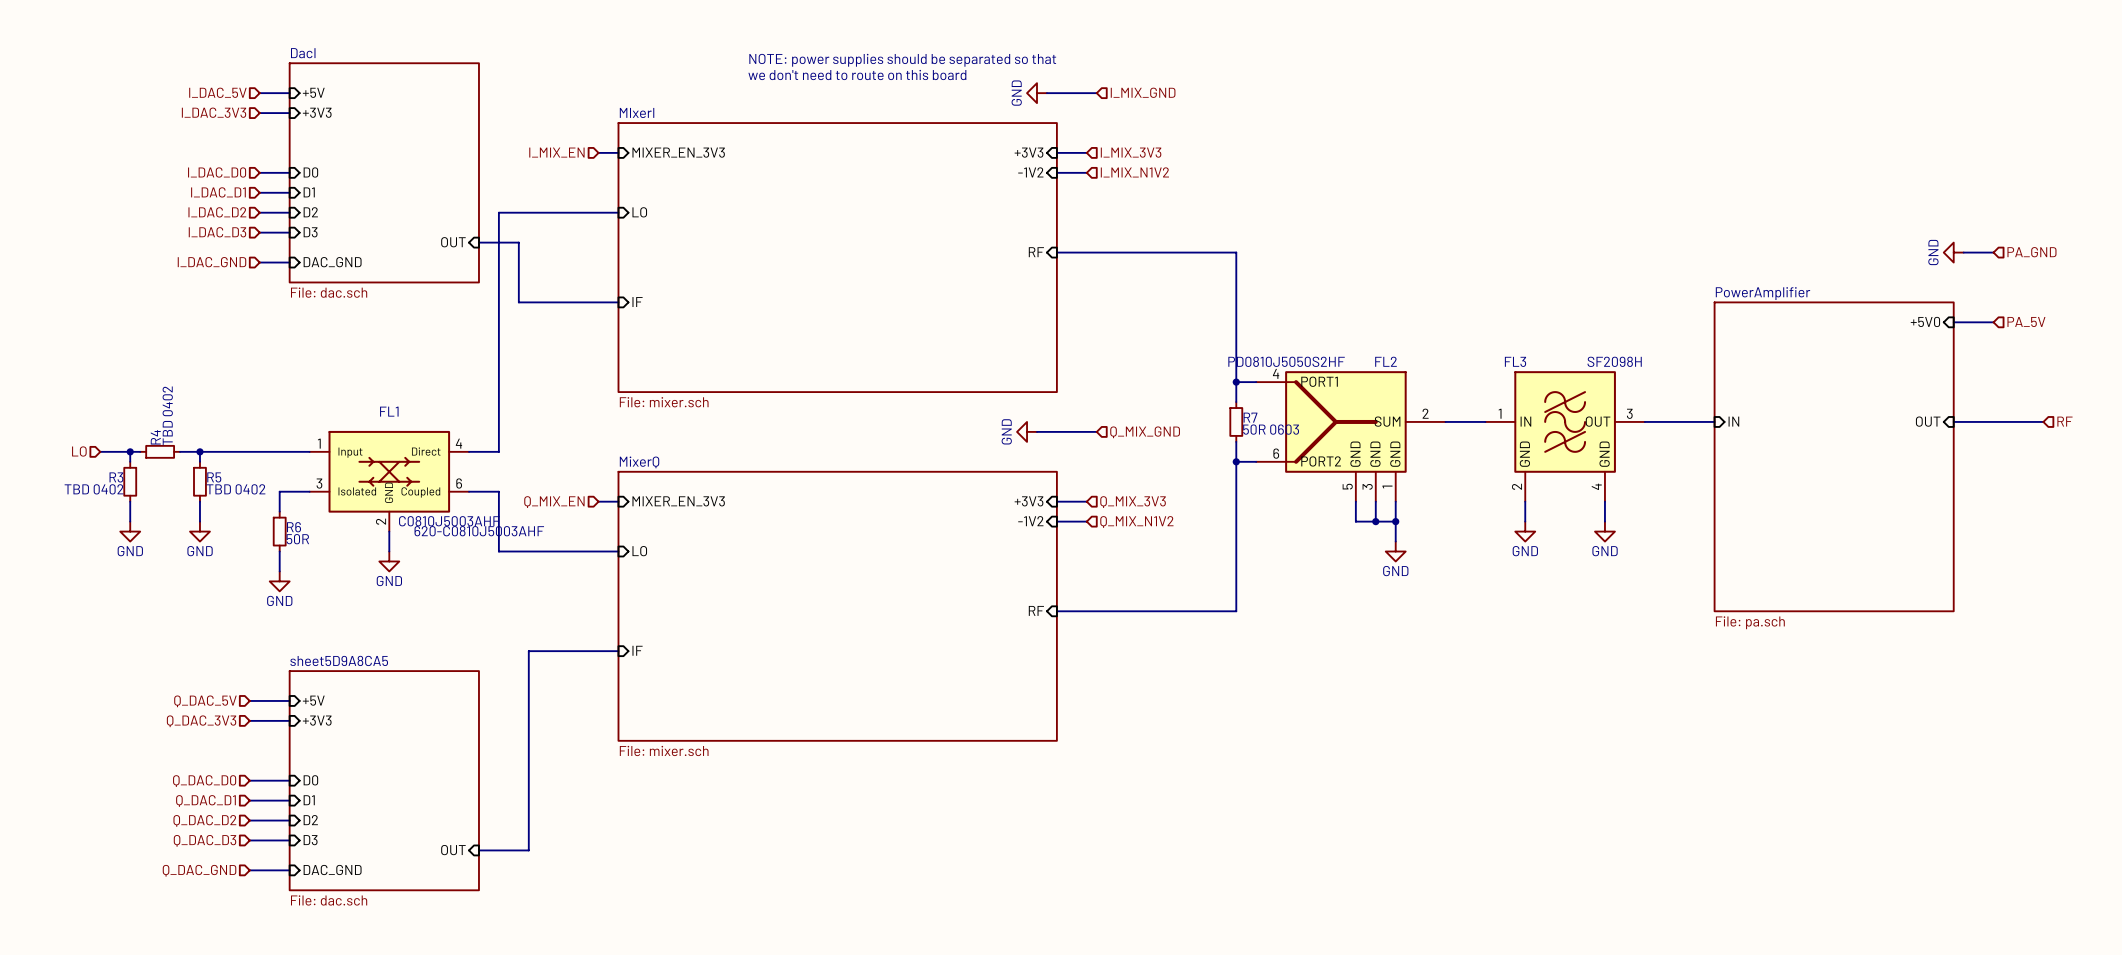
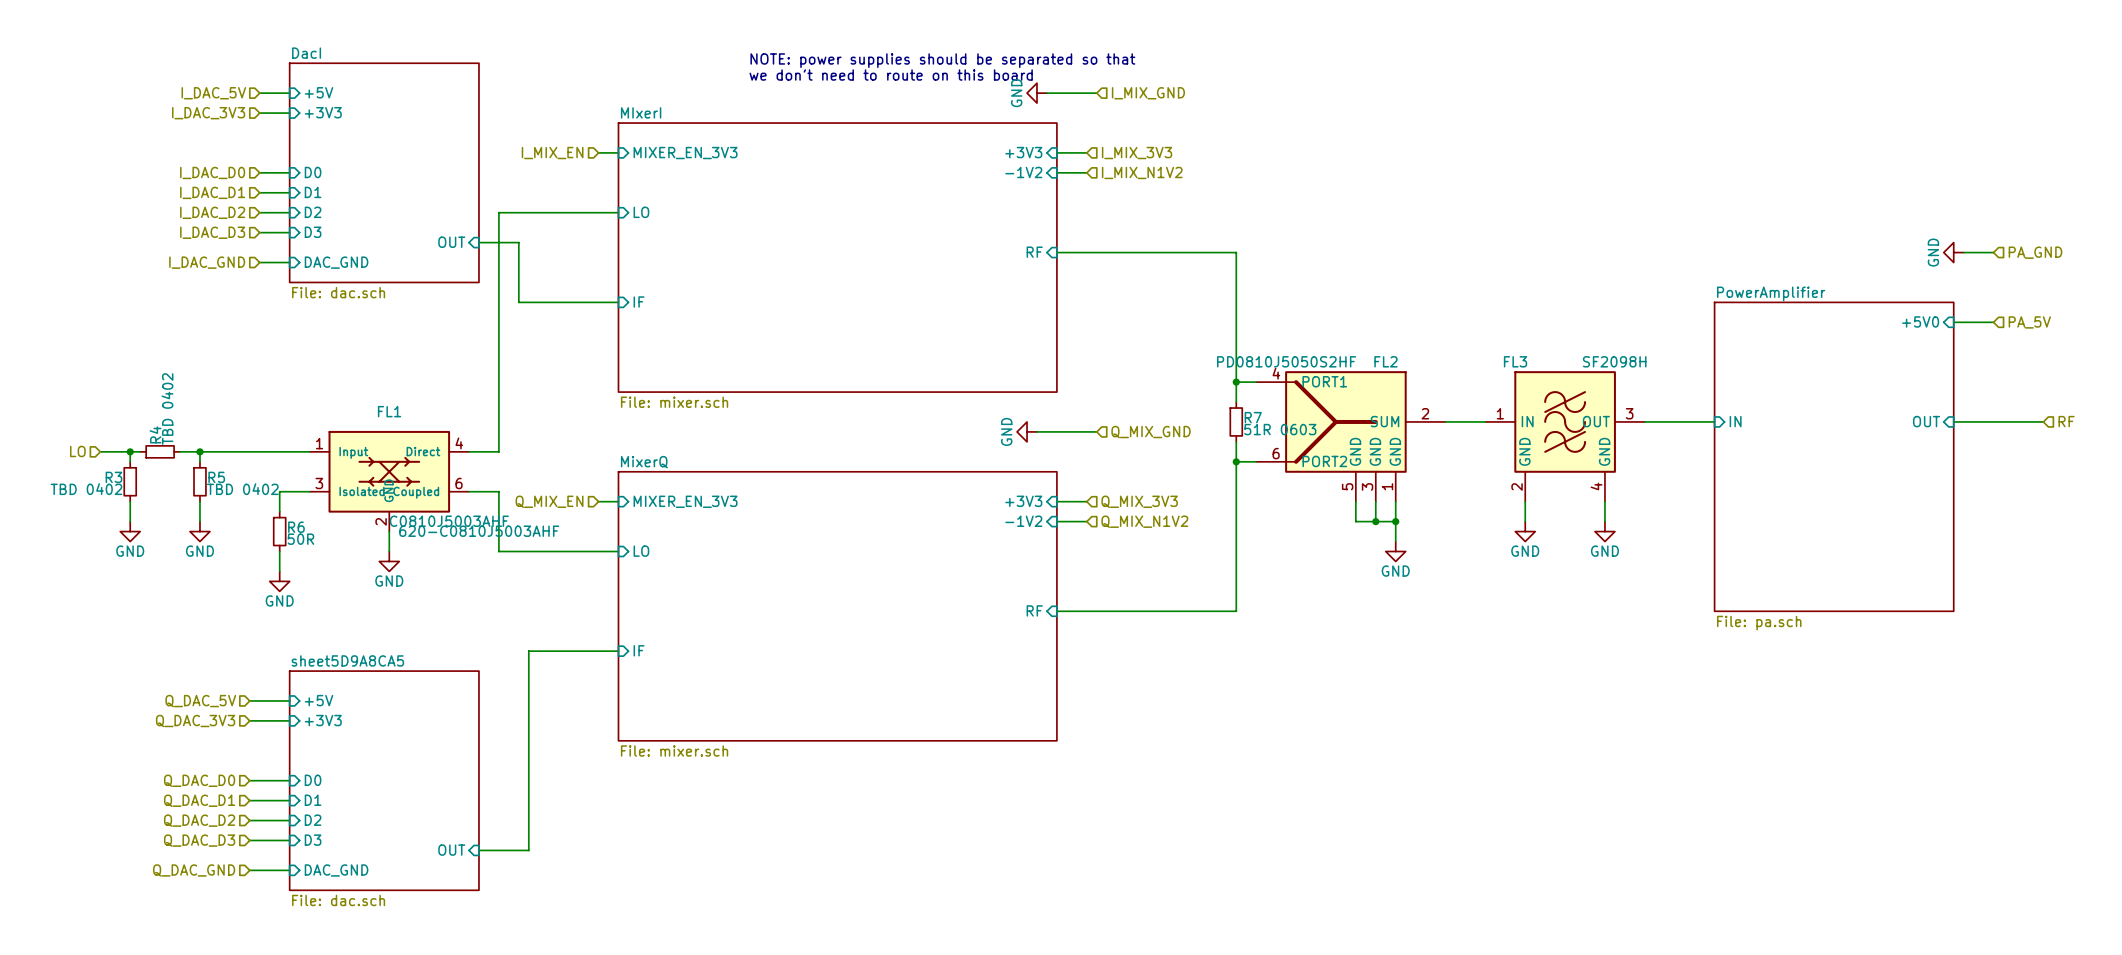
R7 value: 50R 0603 (1271, 429) -> 51R 0603 (1280, 429)

